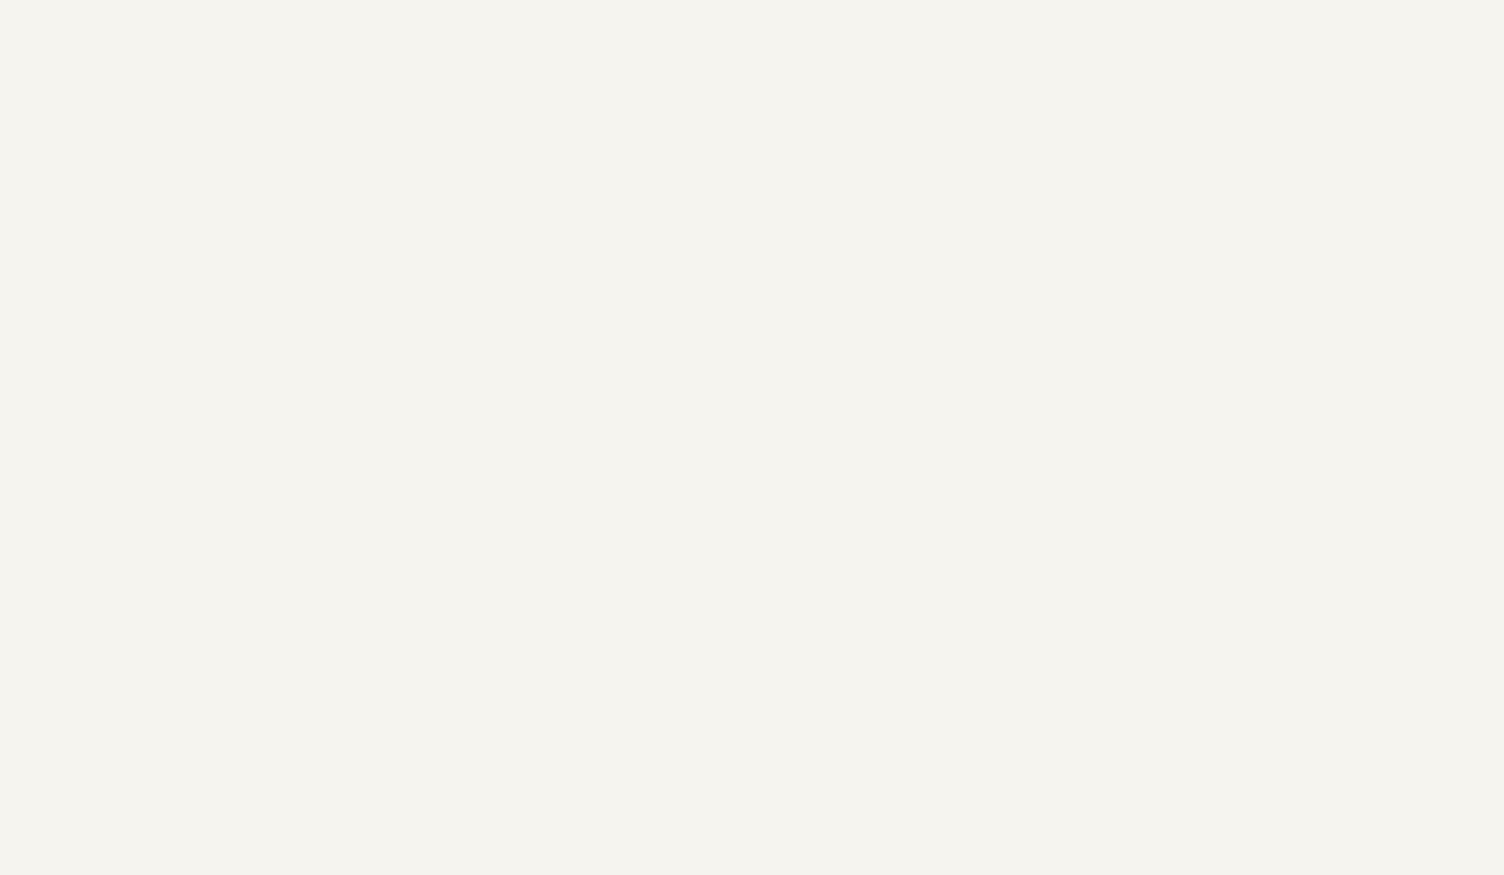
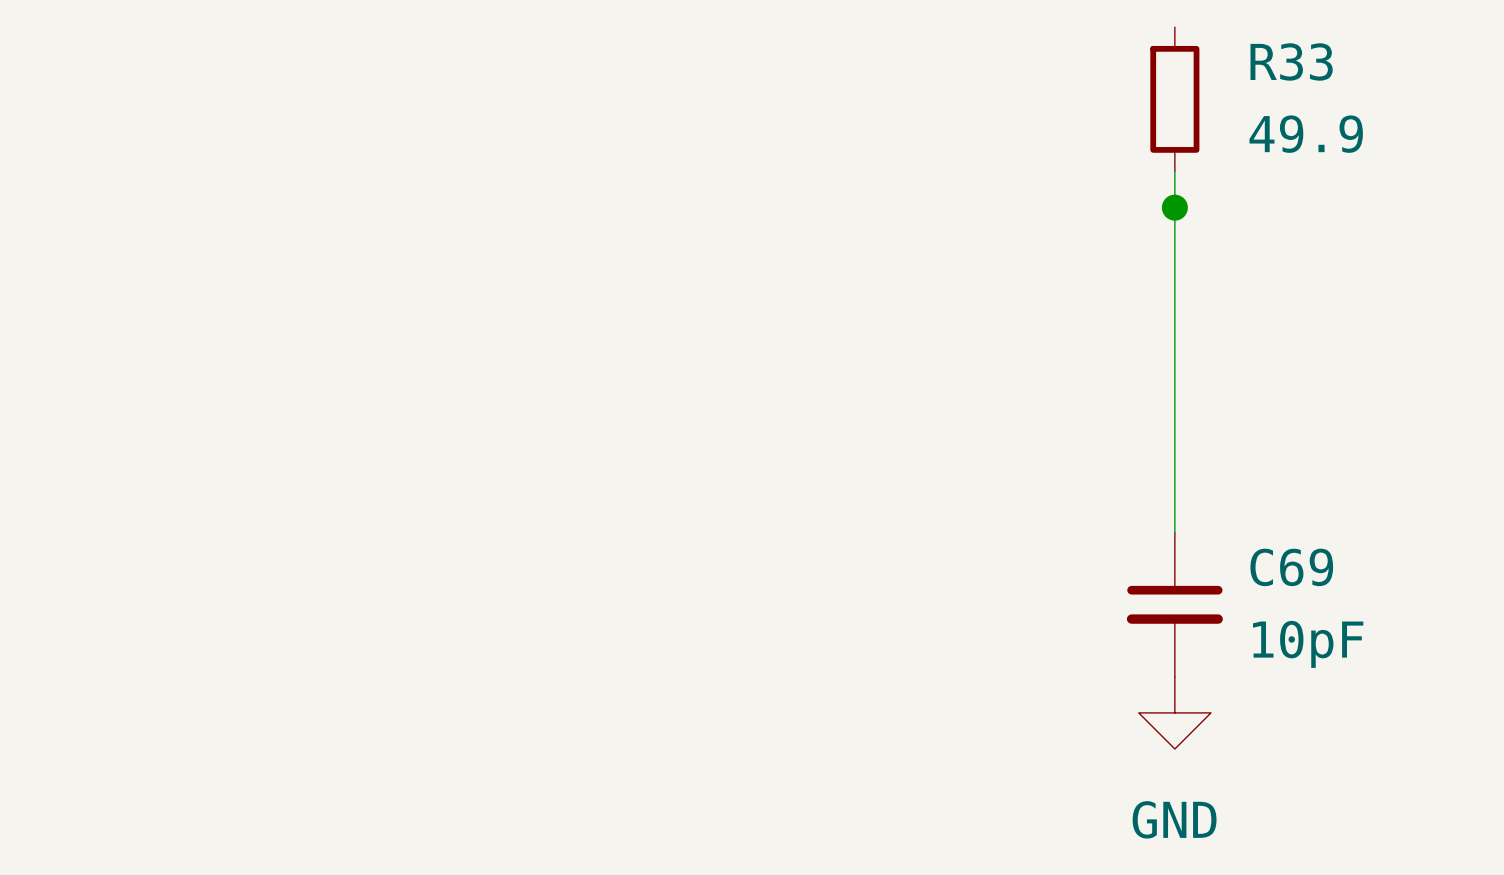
R33: none -> 49.9 (1174, 99)
wire: none -> (1174, 171) (1174, 532)
junction: none -> (1174, 207)
C69: none -> 10pF (1174, 604)
power symbol: none -> GND (1174, 712)

